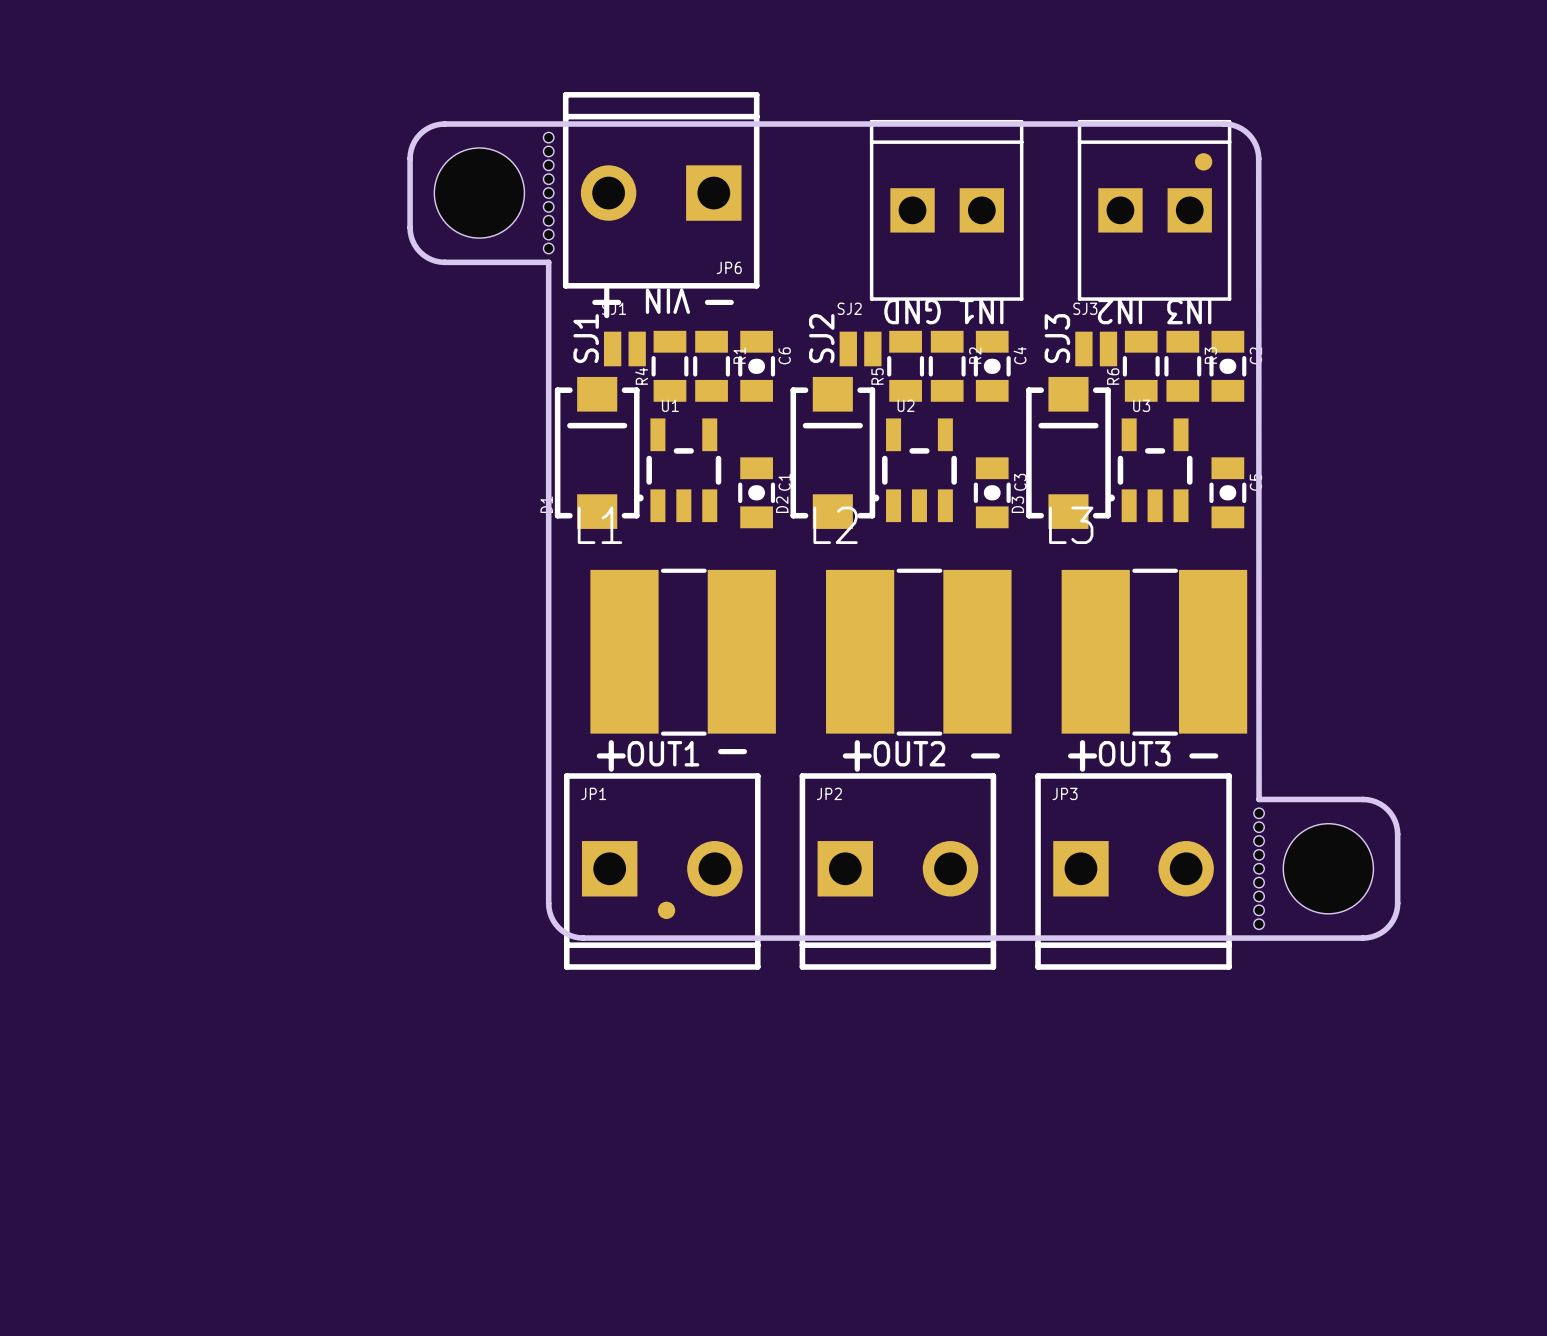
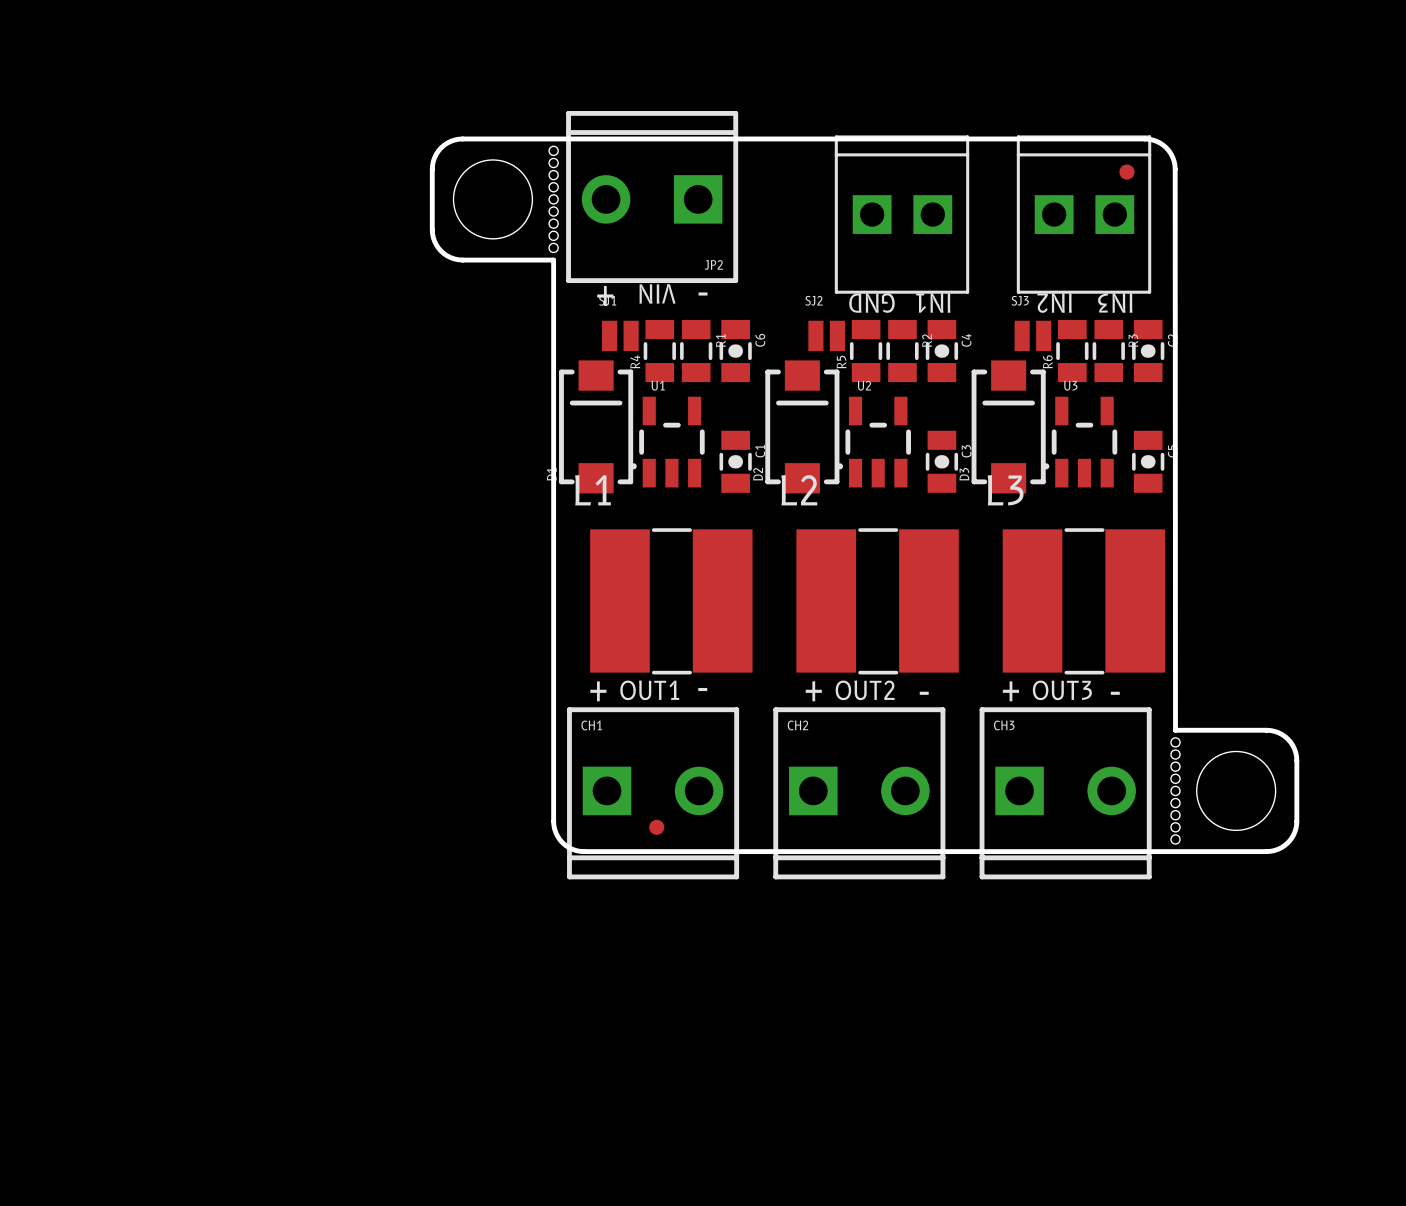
JP6 name: JP6 (729, 267) -> JP2 (713, 264)
text: SJ1 (586, 338) -> none
text: SJ2 (821, 338) -> none
text: SJ3 (1057, 338) -> none
JP1 name: JP1 (593, 793) -> CH1 (591, 725)
JP2 name: JP2 (829, 793) -> CH2 (797, 725)
JP3 name: JP3 (1065, 793) -> CH3 (1004, 725)

